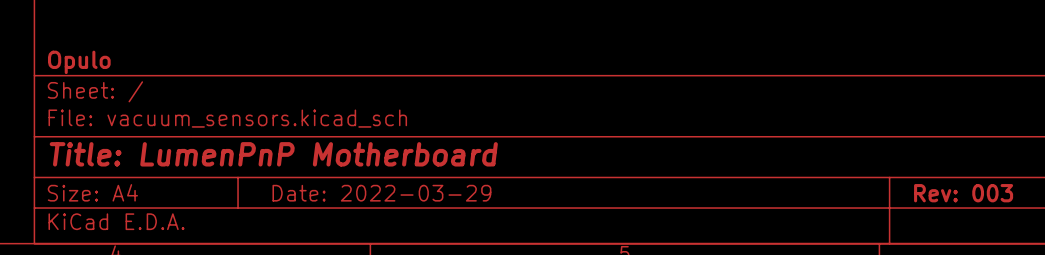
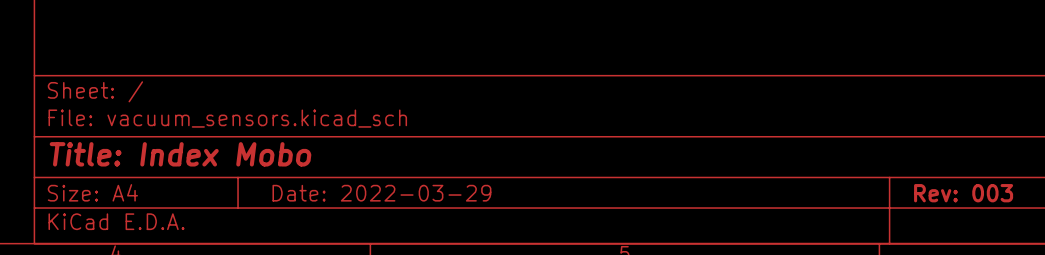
title block: Opulo (79, 62) -> none
title block: Title: LumenPnP Motherboard (273, 154) -> Title: Index Mobo (180, 154)

